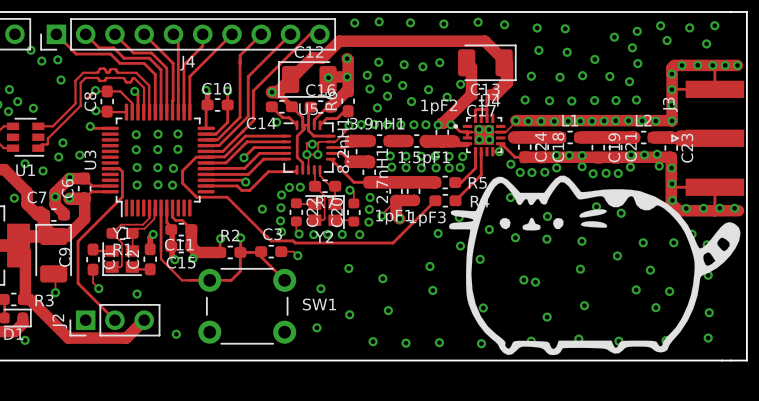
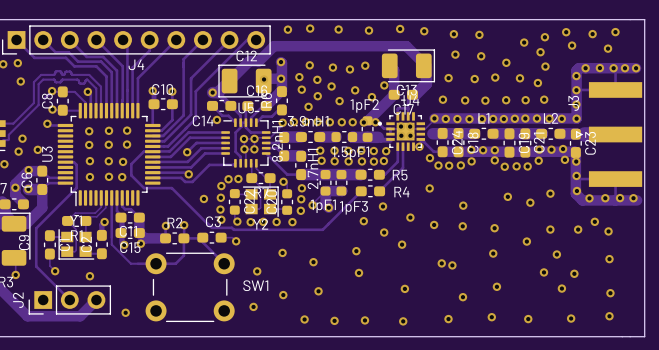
via: none -> (244, 139)
via: none -> (254, 138)
via: (312, 144) -> none
drawing: [449, 175, 741, 356] -> none

